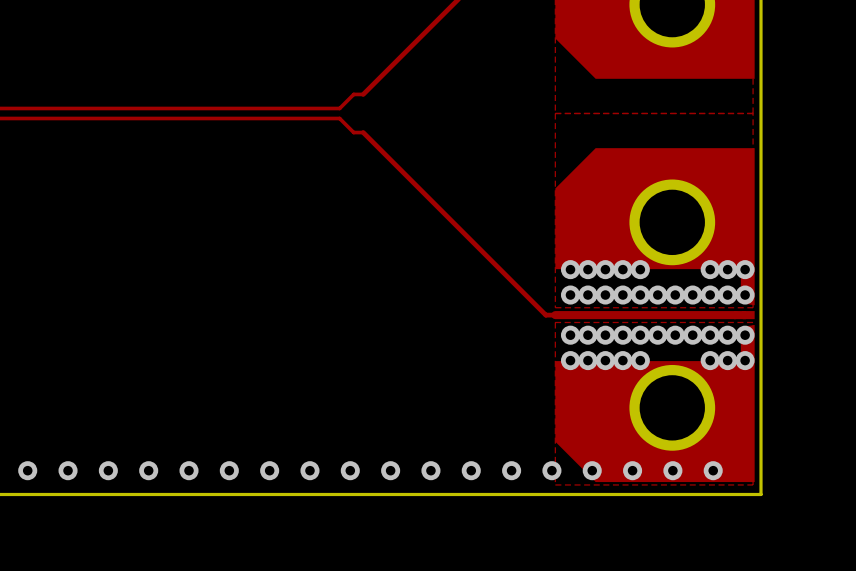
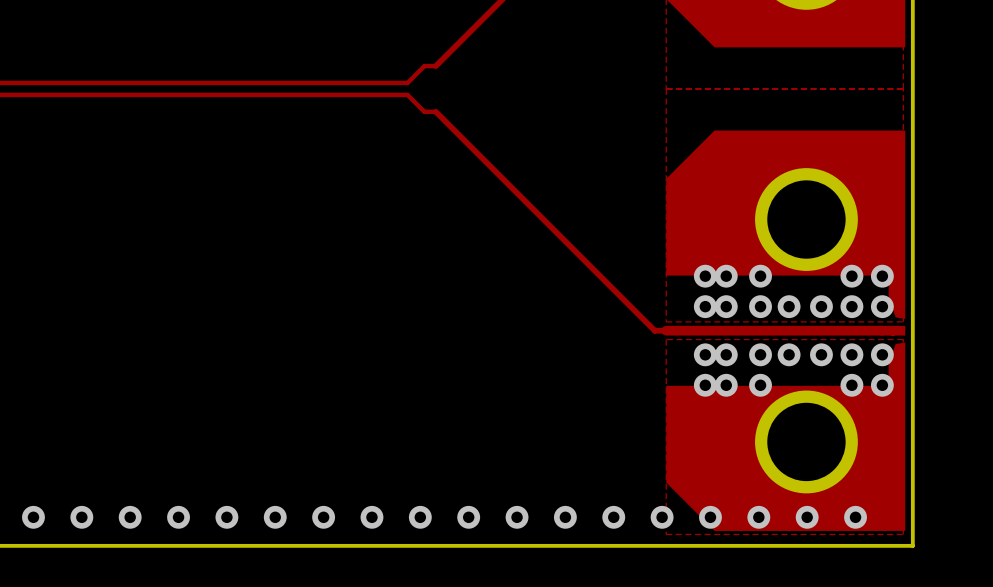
via: (570, 269) -> none
via: (622, 269) -> none
via: none -> (760, 276)
via: (640, 269) -> none
via: (727, 269) -> none
via: none -> (882, 276)
via: (745, 269) -> none
via: (570, 295) -> none
via: (622, 295) -> none
via: none -> (760, 306)
via: (640, 295) -> none
via: (675, 295) -> none
via: none -> (821, 306)
via: (692, 295) -> none
via: (727, 295) -> none
via: none -> (882, 306)
via: (745, 295) -> none
via: (570, 335) -> none
via: (622, 335) -> none
via: none -> (760, 354)
via: (640, 335) -> none
via: (675, 335) -> none
via: none -> (821, 354)
via: (692, 335) -> none
via: (727, 335) -> none
via: none -> (882, 354)
via: (745, 335) -> none
via: (570, 360) -> none
via: (622, 360) -> none
via: none -> (760, 385)
via: (640, 360) -> none
via: (727, 360) -> none
via: none -> (882, 385)
via: (745, 360) -> none

